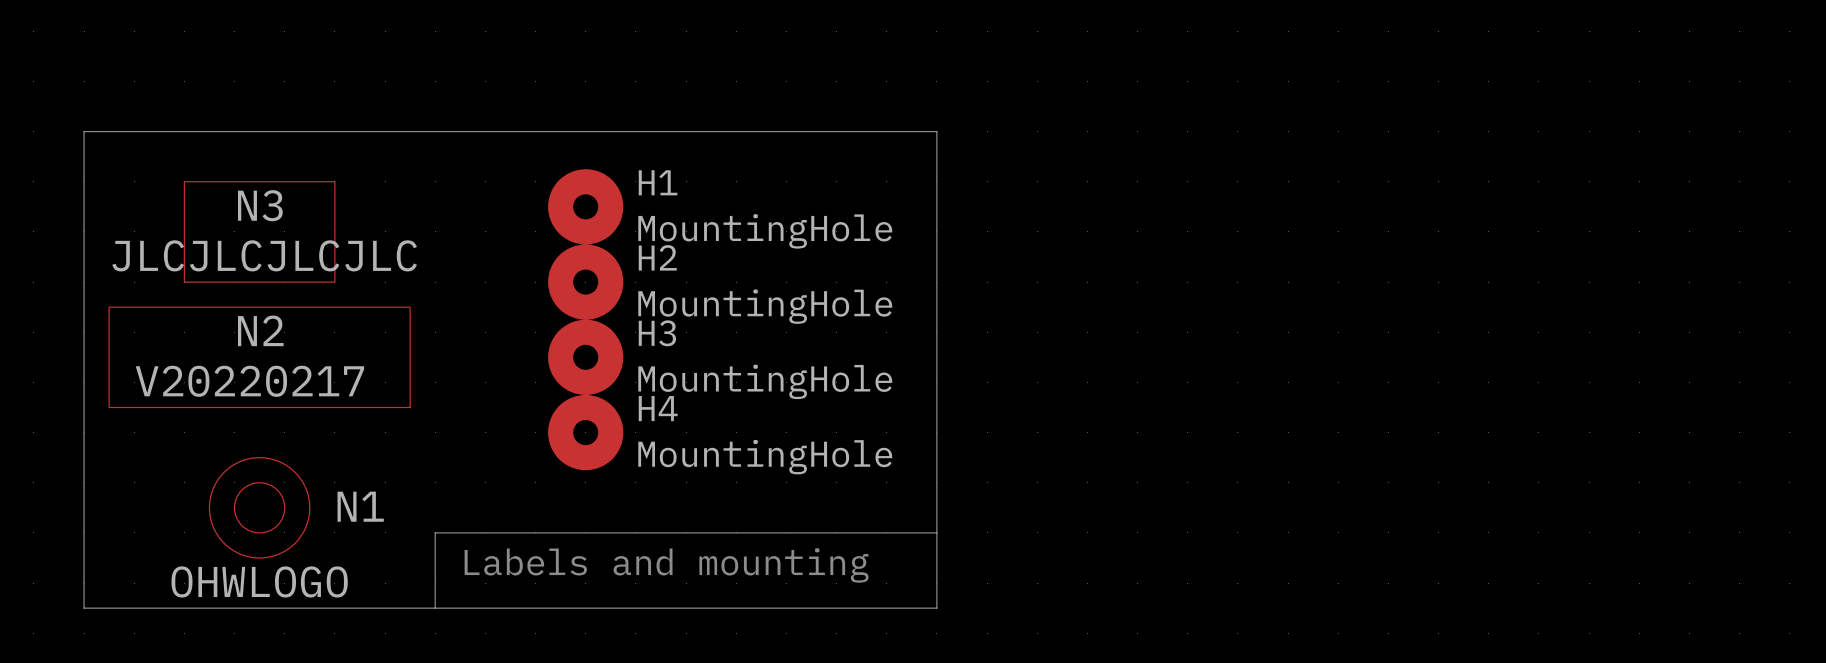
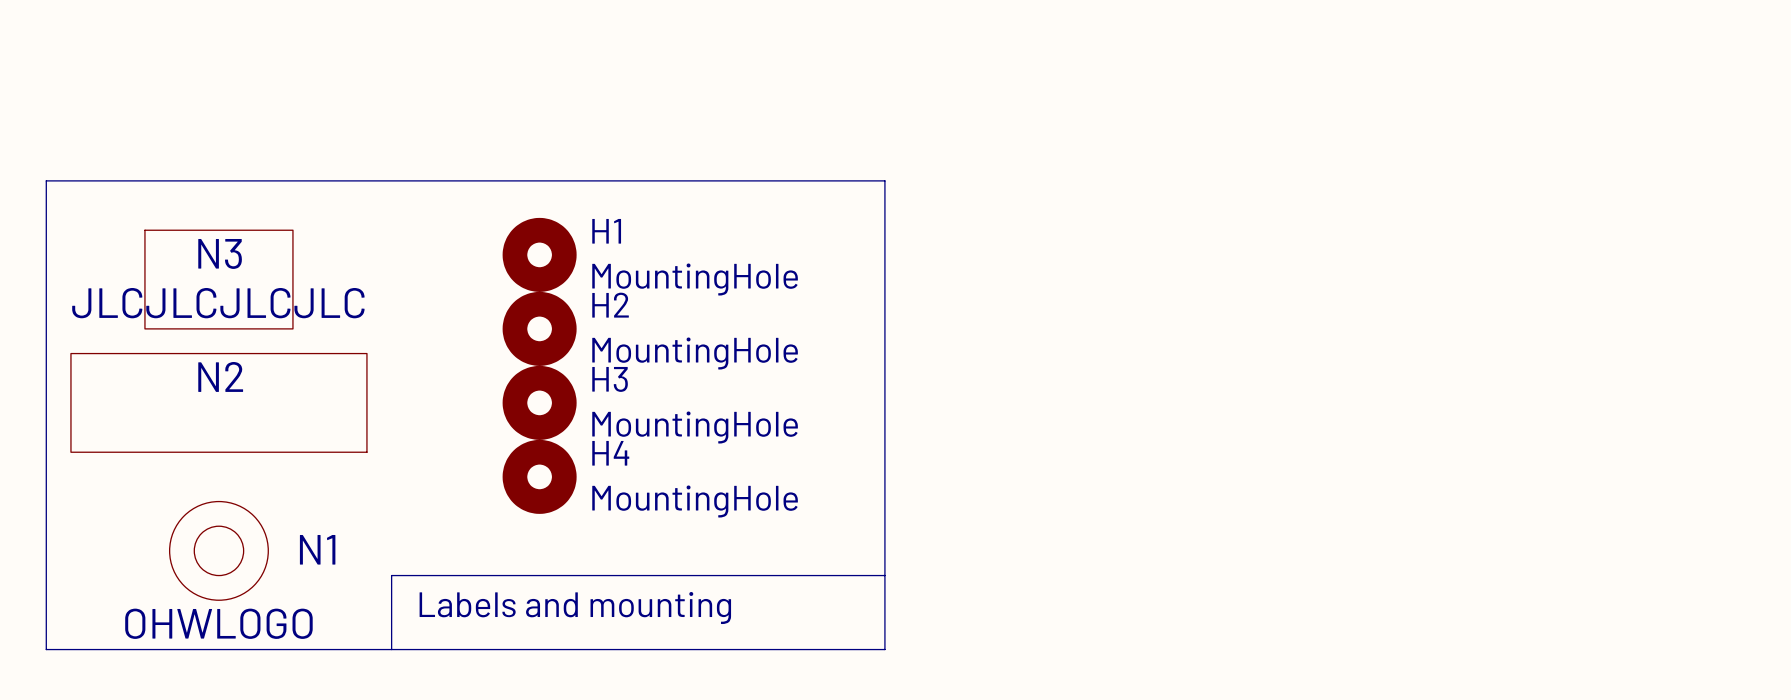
N2 value: V20220217 (249, 381) -> none

